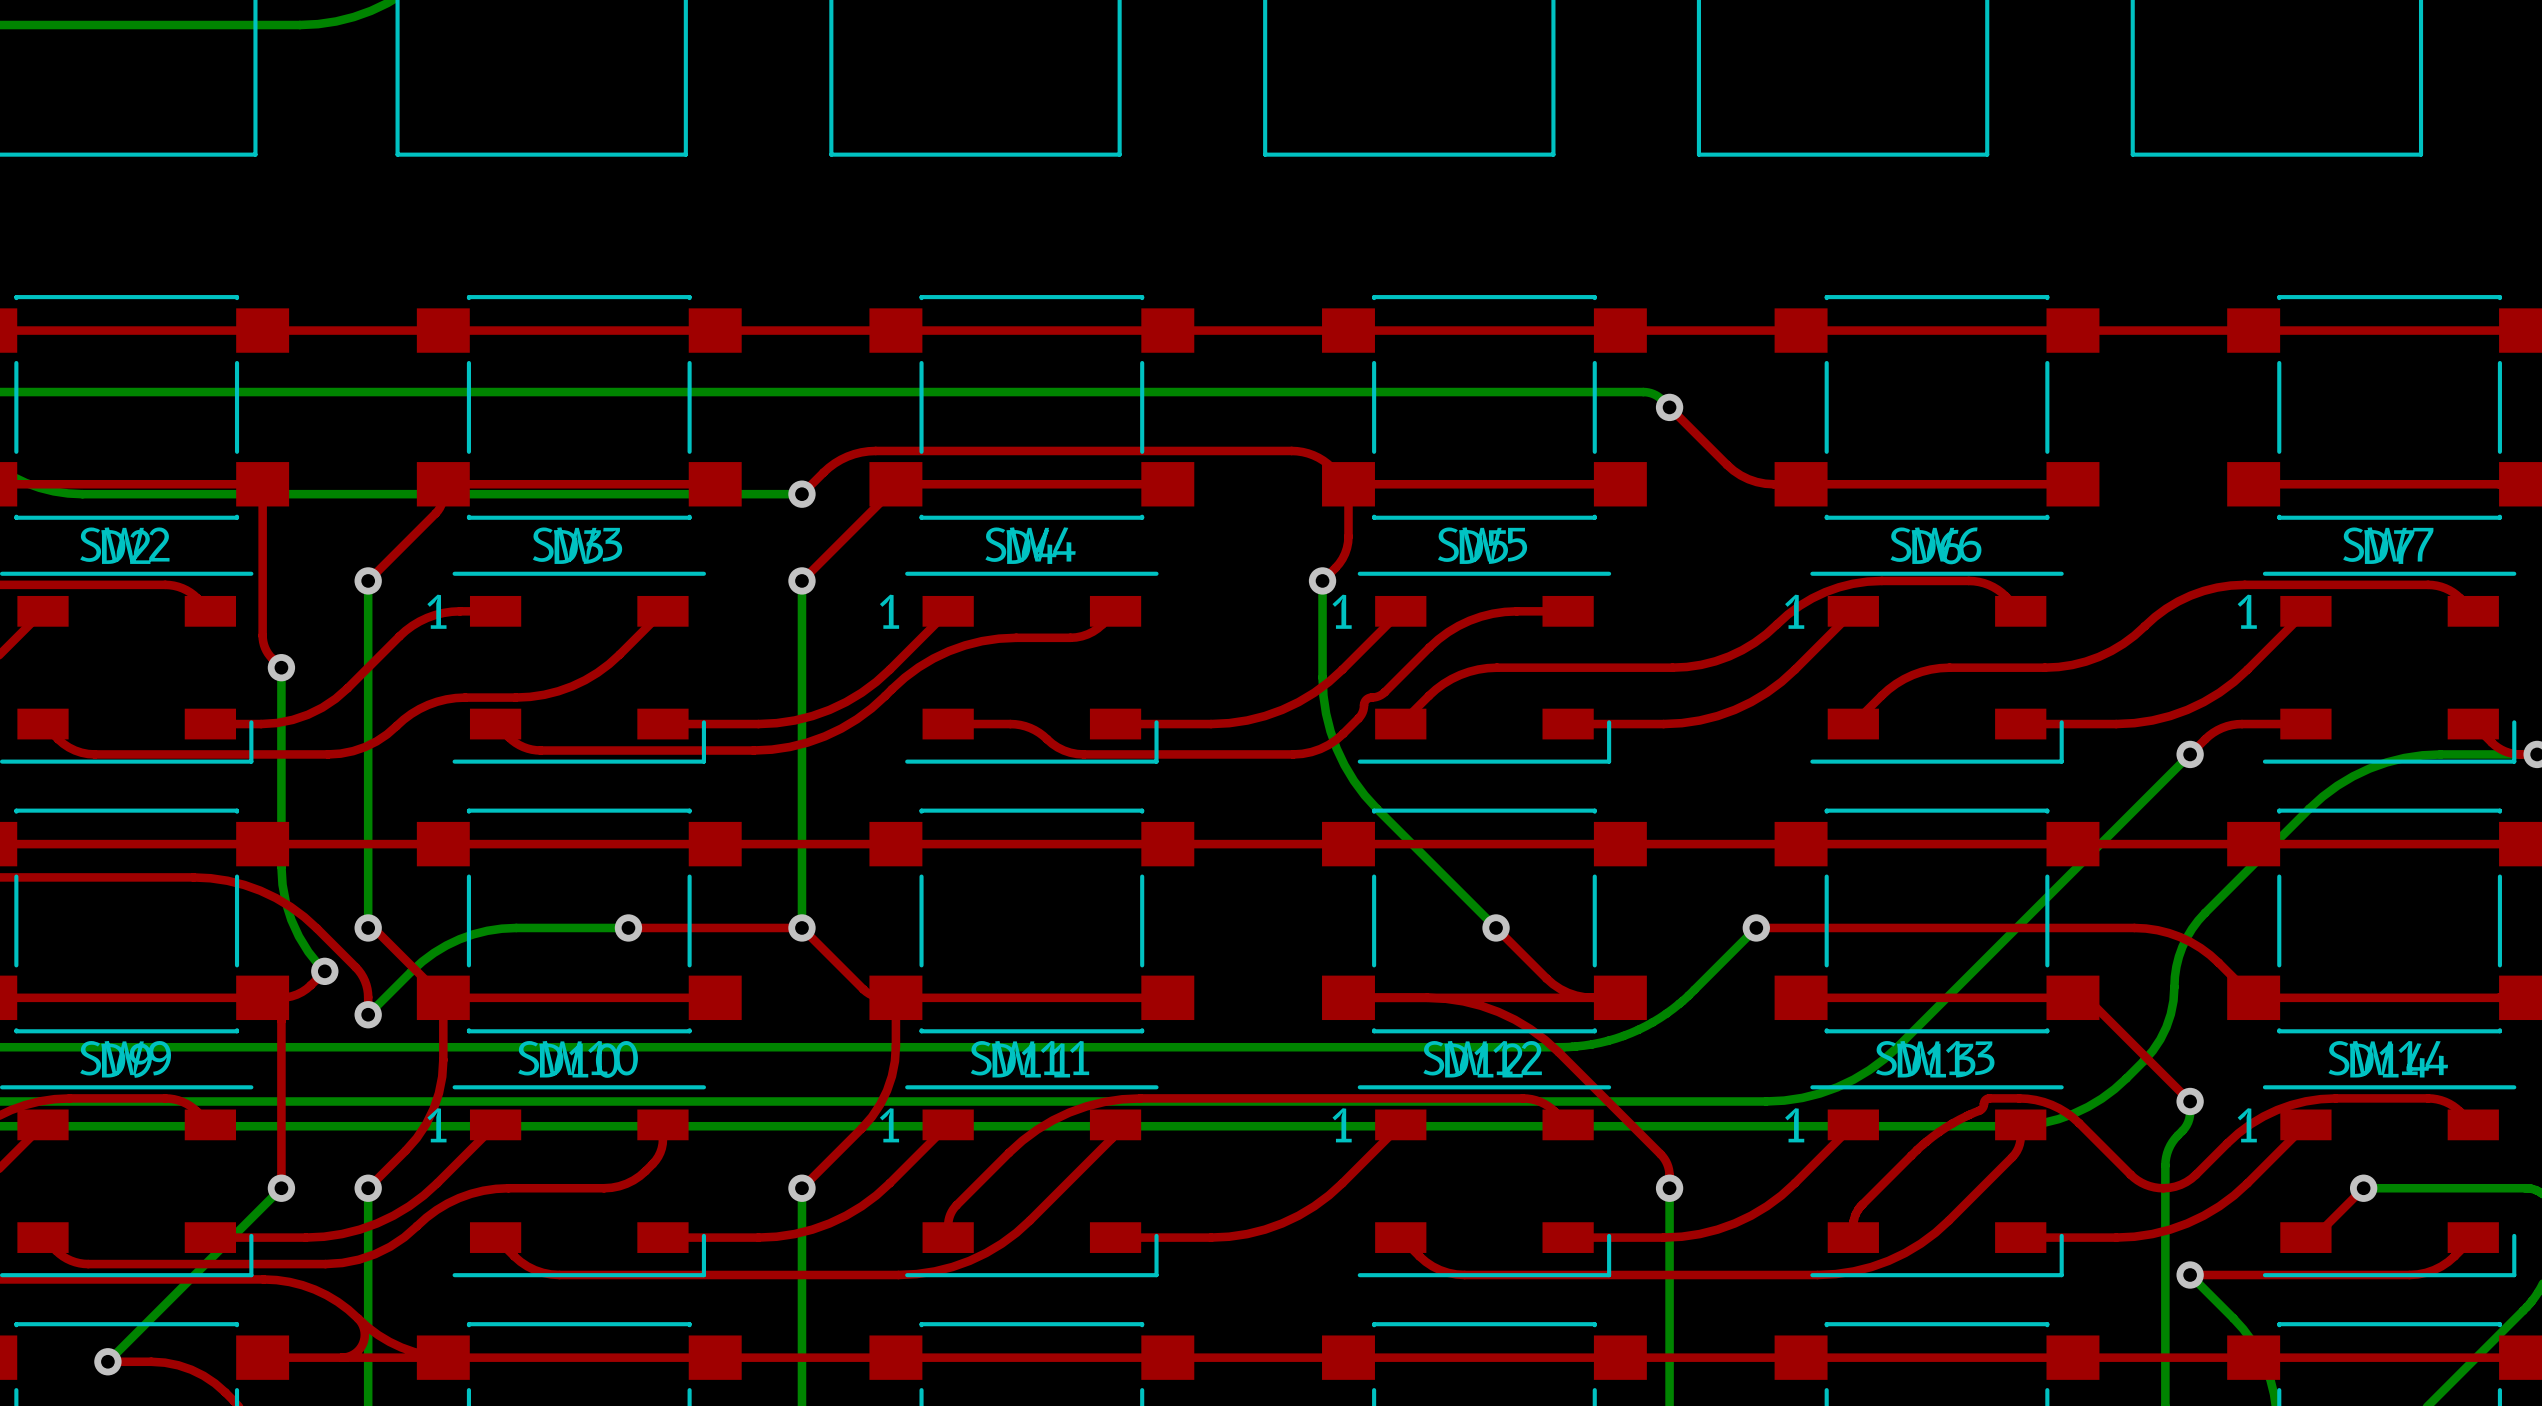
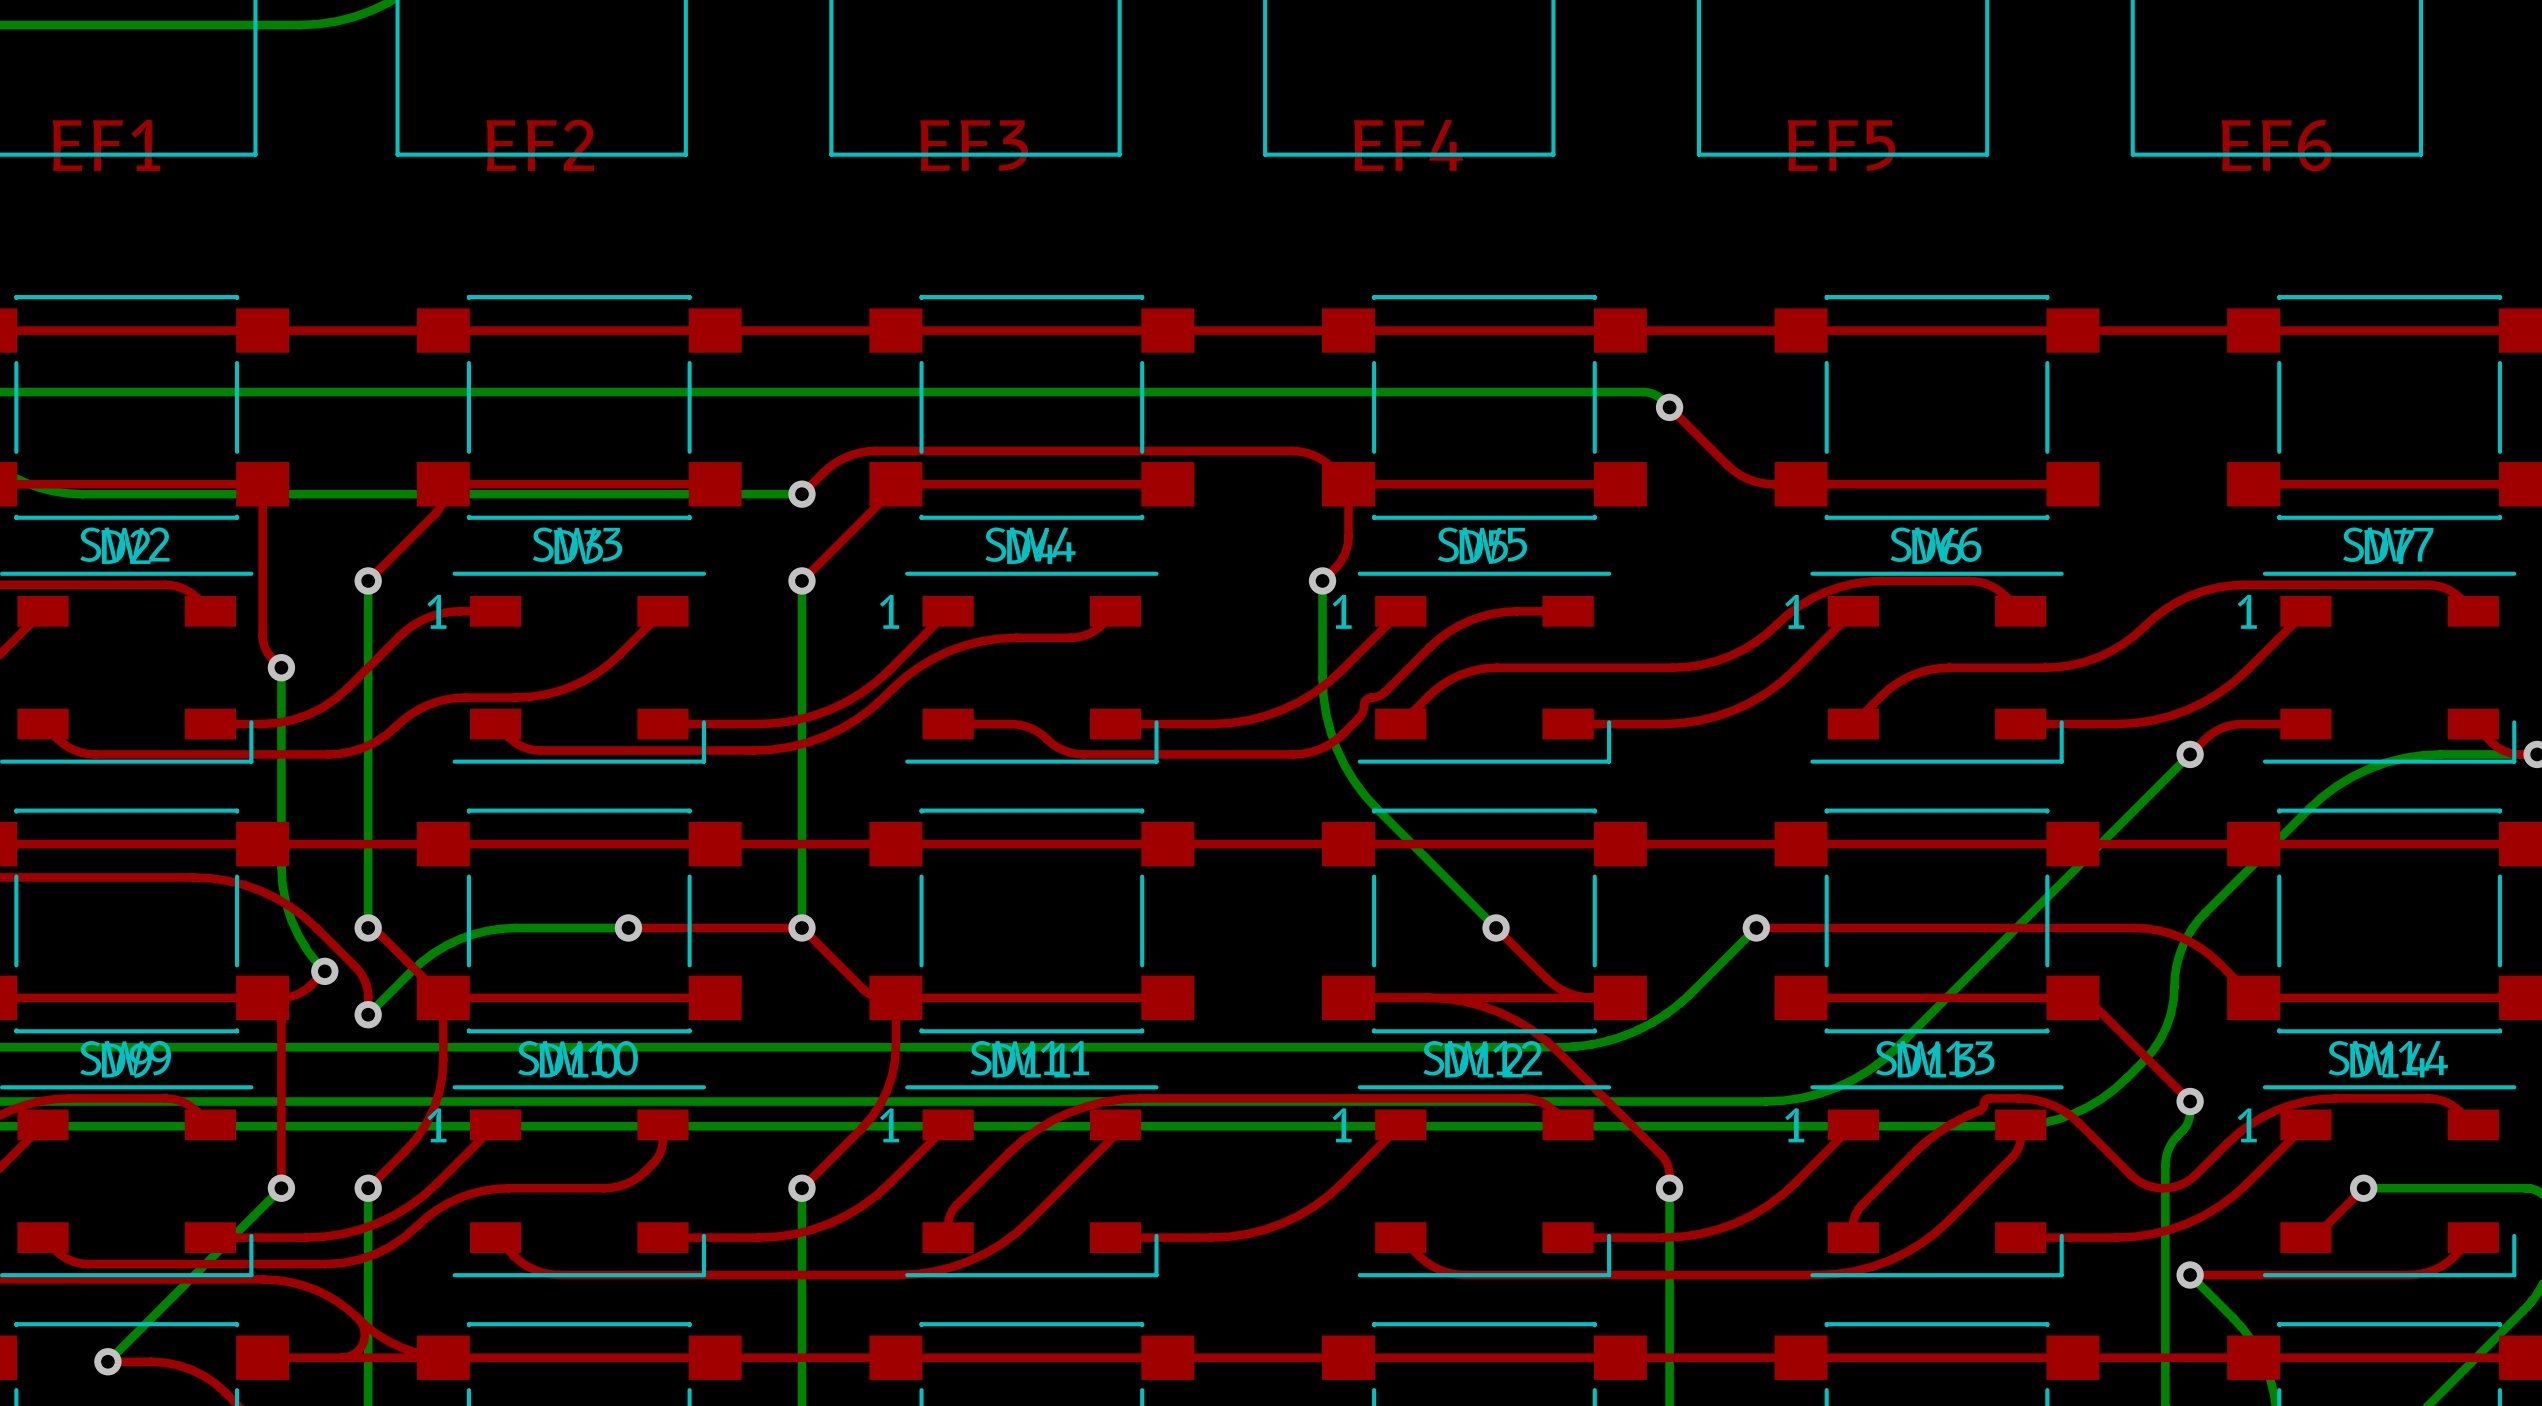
text: none -> EF1 (106, 145)
text: none -> EF2 (540, 145)
text: none -> EF3 (974, 145)
text: none -> EF4 (1408, 145)
text: none -> EF5 (1841, 145)
text: none -> EF6 (2276, 145)

